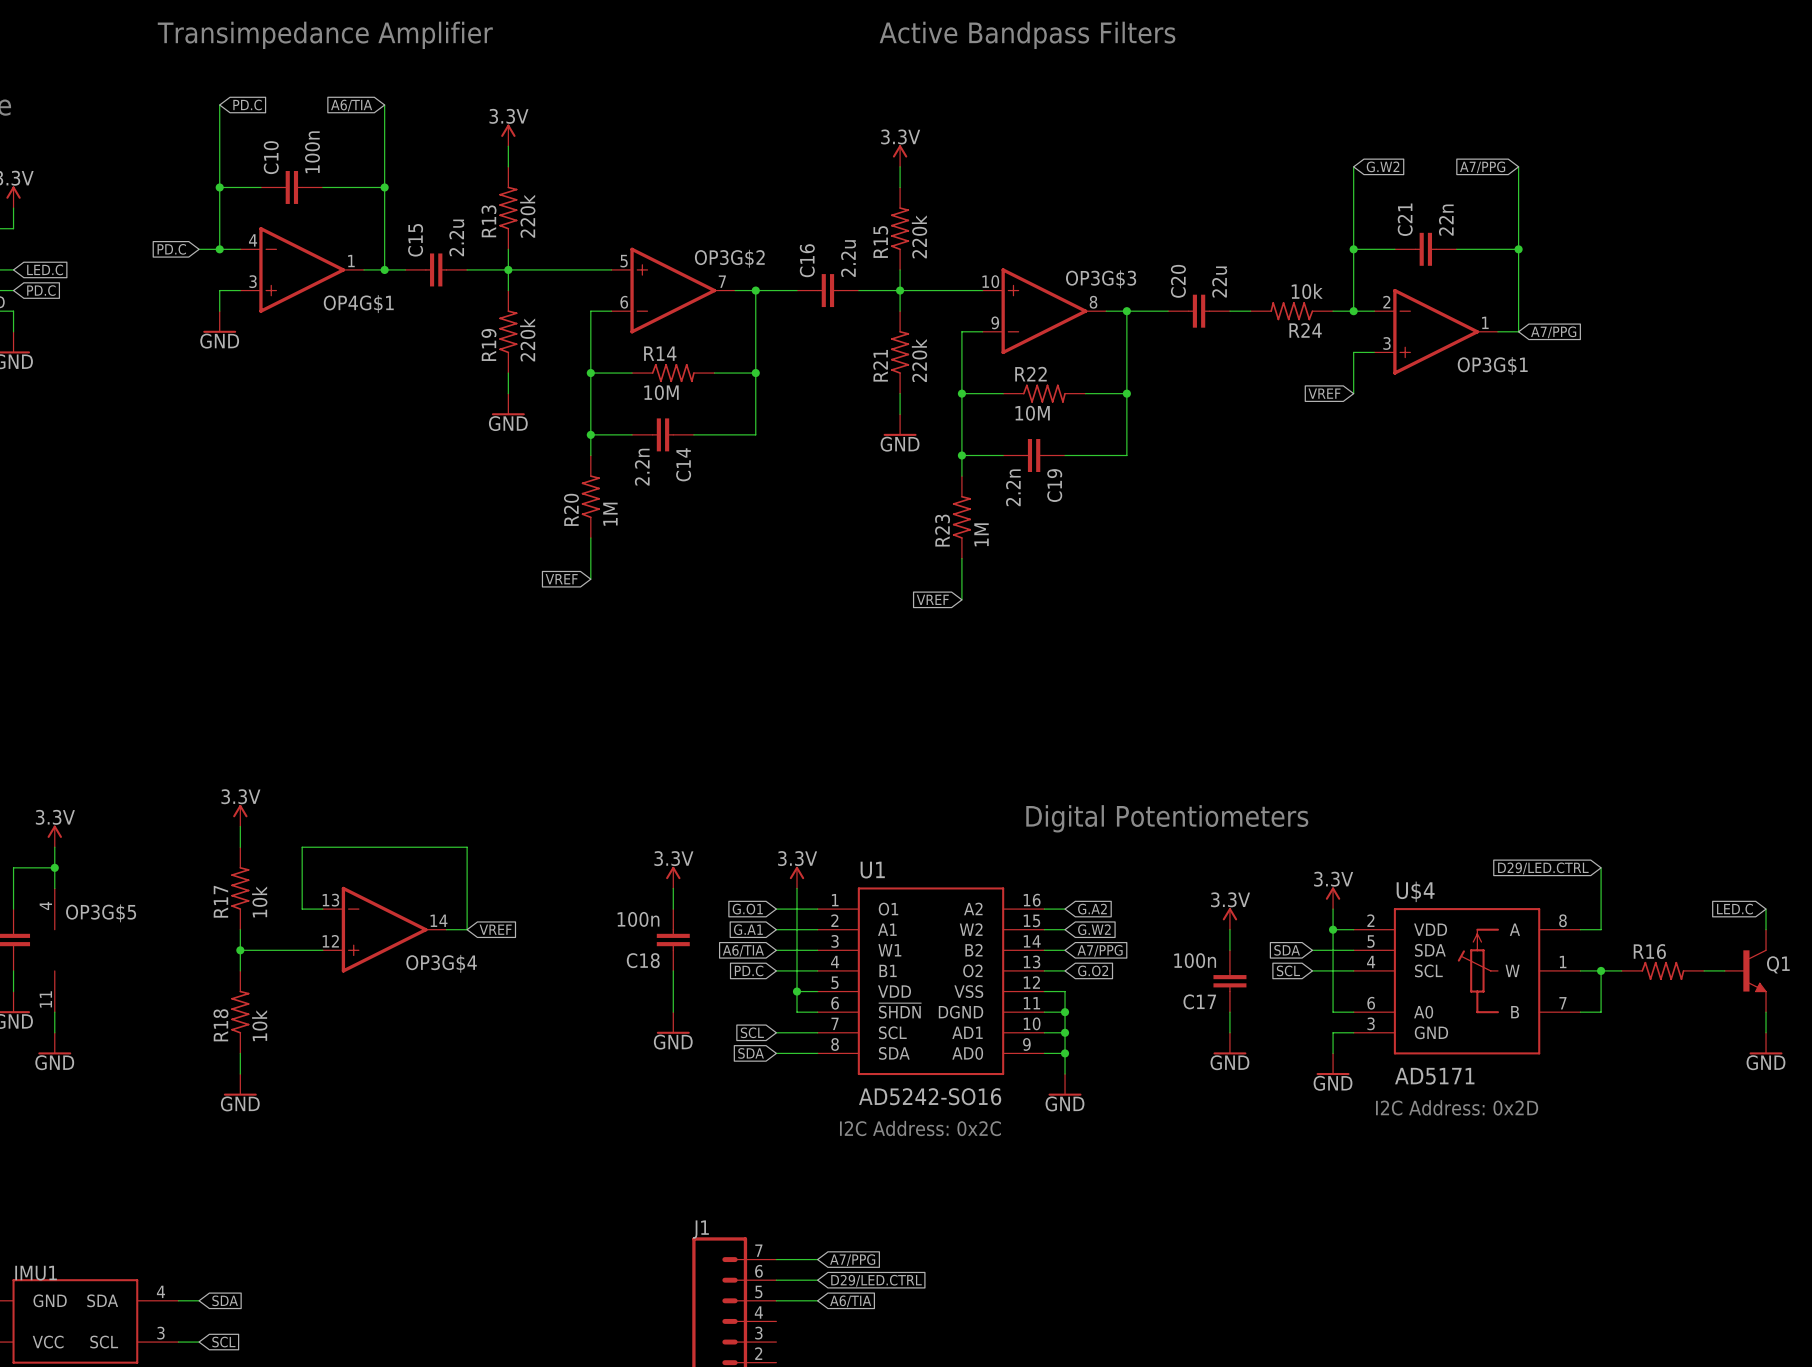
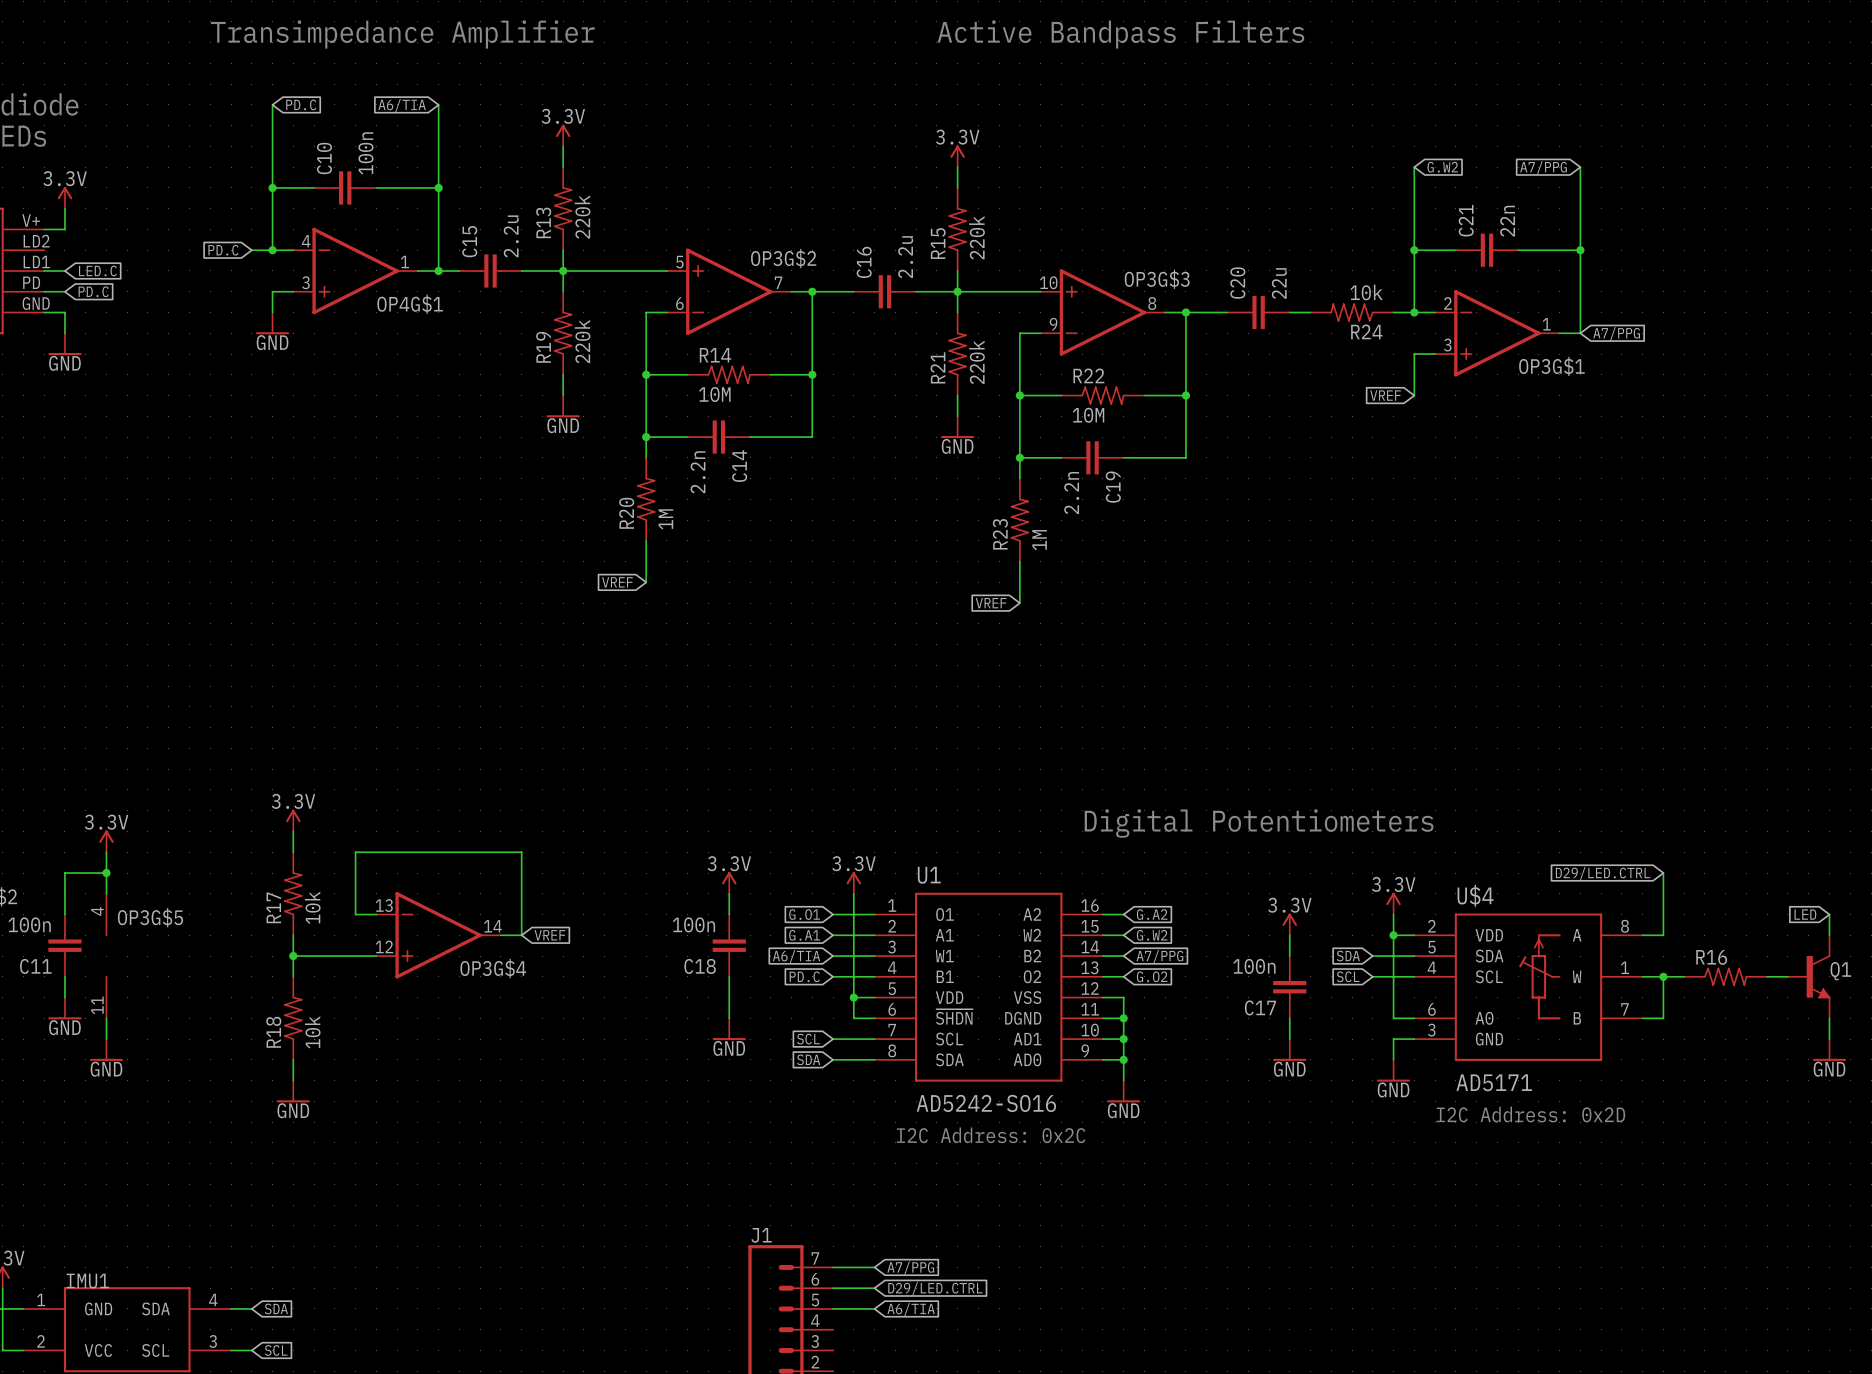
global label: LED.C (1734, 909) -> LED (1805, 914)

